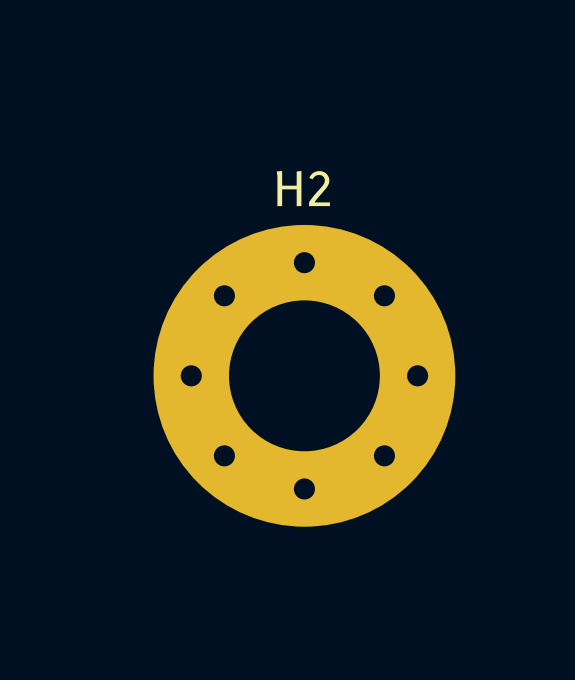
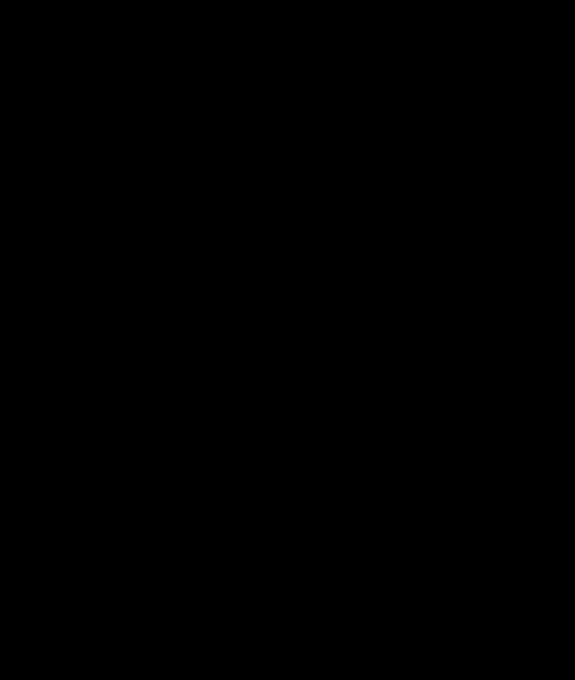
H2: (304, 375) -> none

